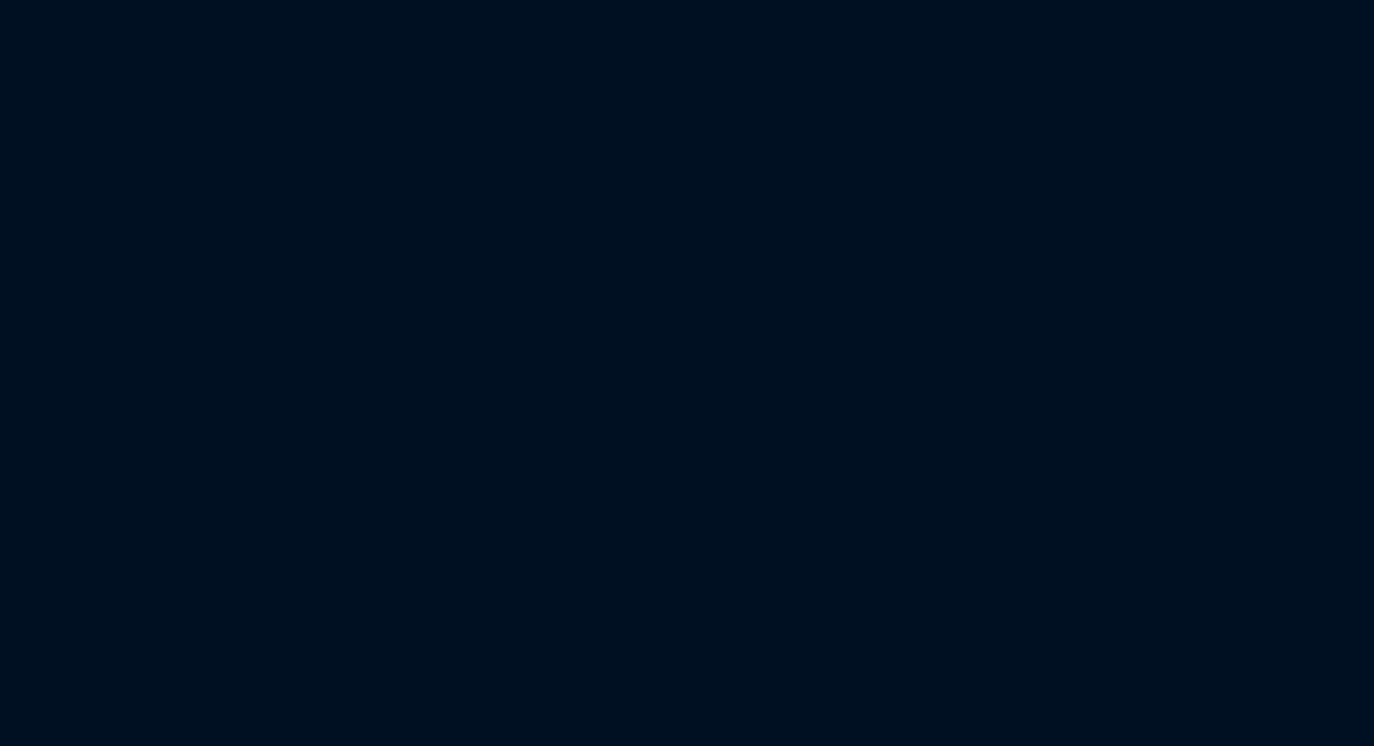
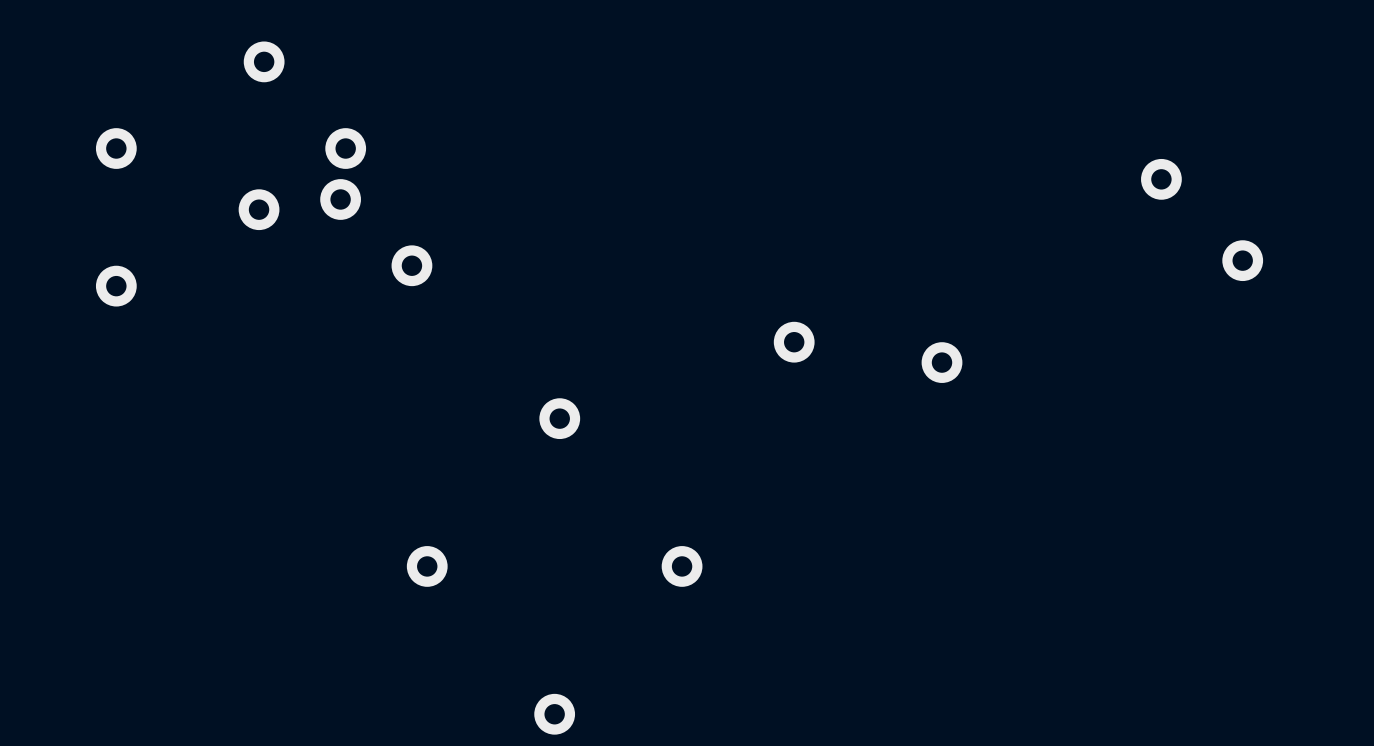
via: none -> (264, 61)
via: none -> (116, 148)
via: none -> (345, 148)
via: none -> (1161, 179)
via: none -> (340, 199)
via: none -> (259, 209)
via: none -> (1242, 260)
via: none -> (411, 265)
via: none -> (116, 286)
via: none -> (794, 342)
via: none -> (942, 362)
via: none -> (559, 418)
via: none -> (427, 566)
via: none -> (682, 566)
via: none -> (554, 714)

